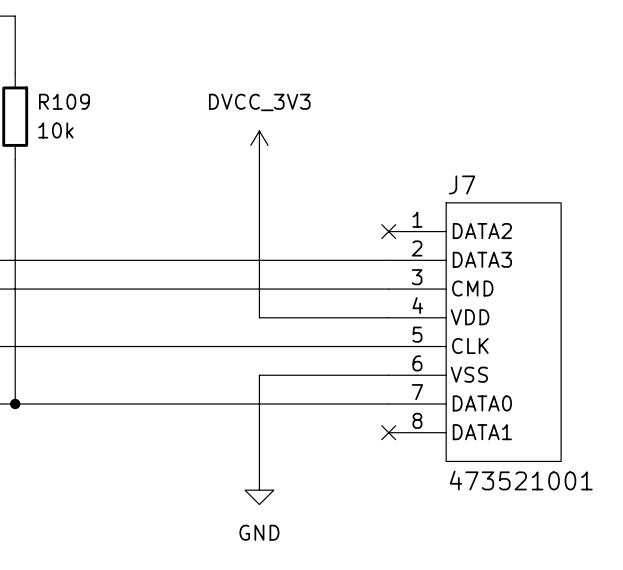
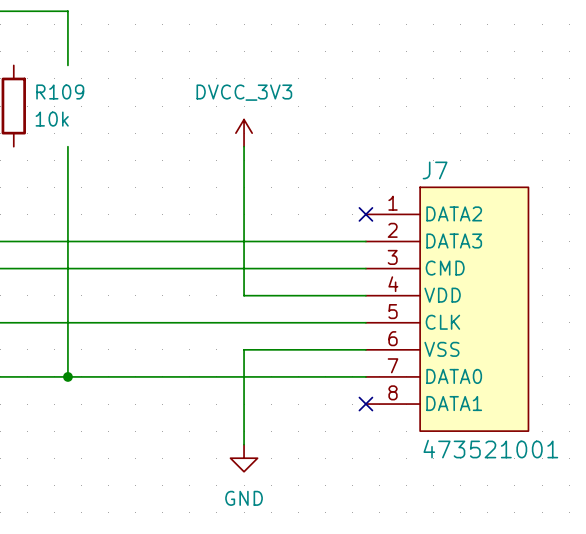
wire: (15, 16) (15, 73) -> (13, 11) (67, 11) (67, 65)
wire: (15, 159) (15, 403) -> (67, 146) (67, 376)
junction: (15, 403) -> none
junction: none -> (67, 376)

